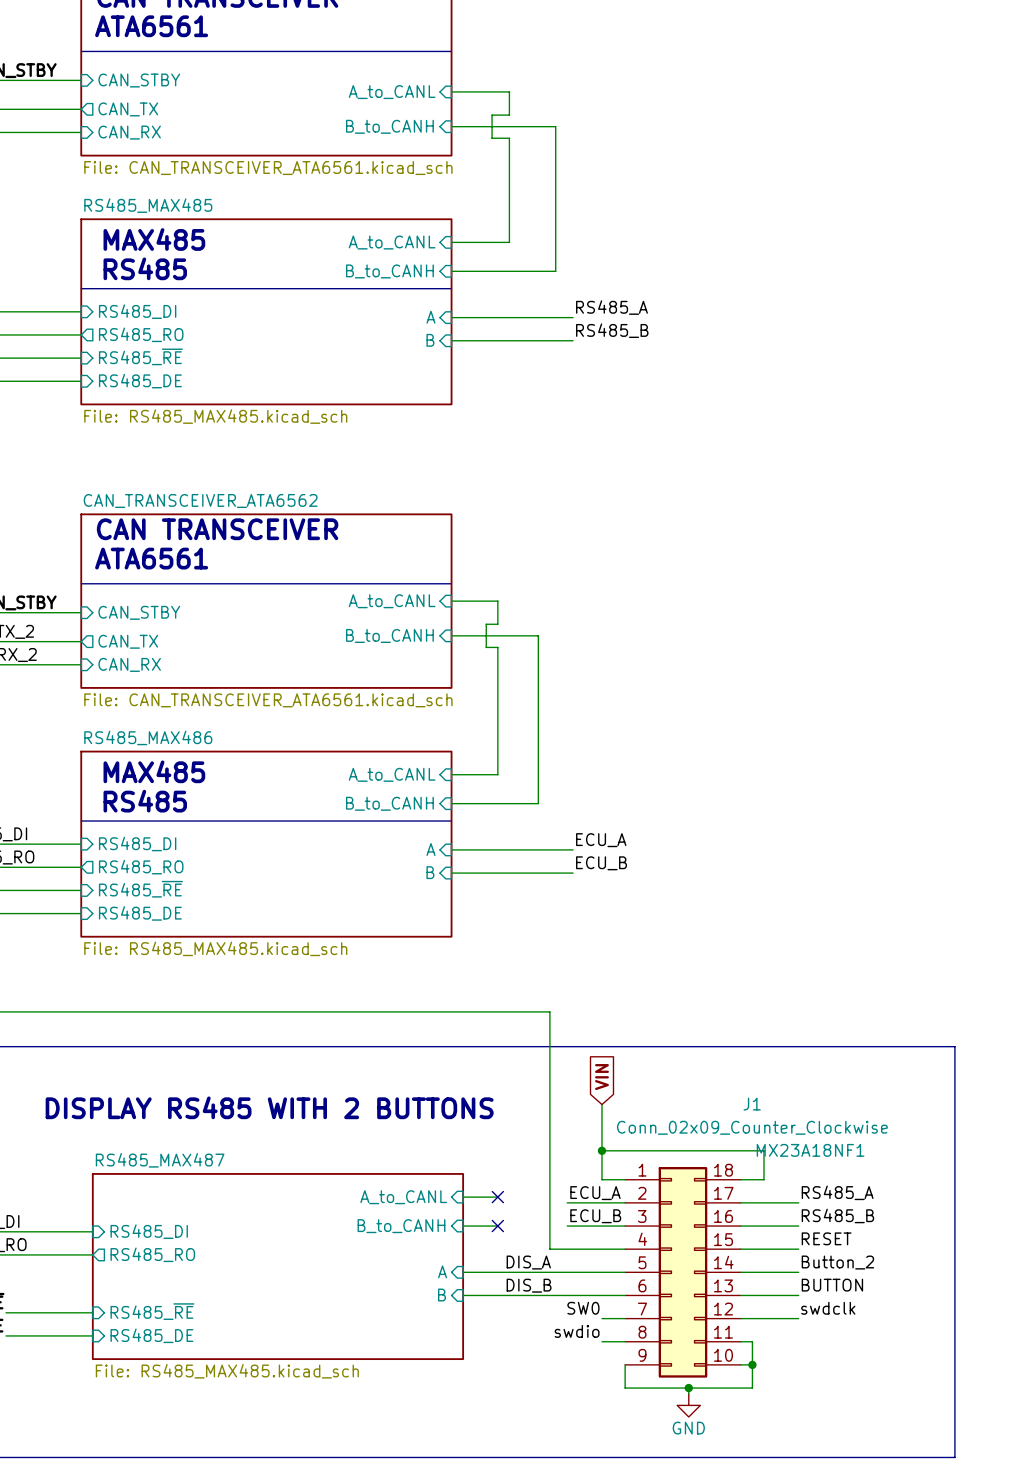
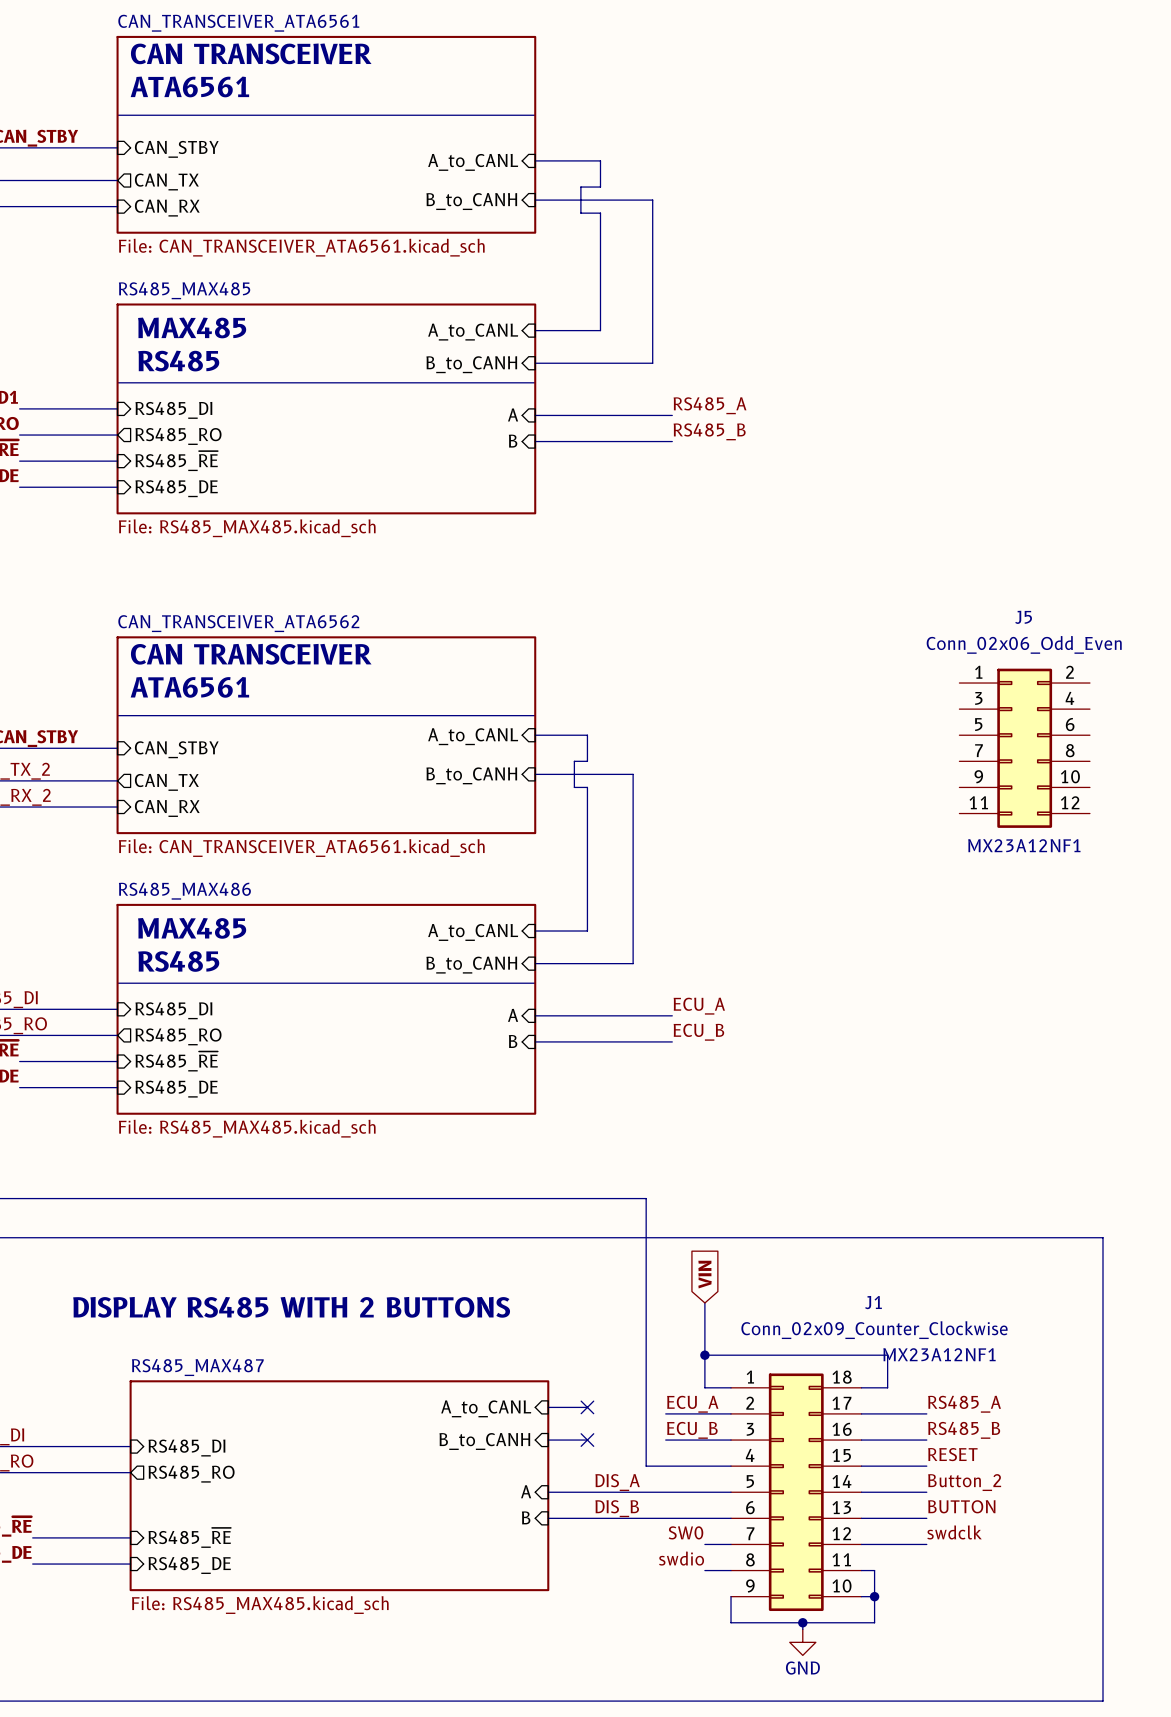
J5: none -> Conn_02x06_Odd_Even (1024, 748)
J1 text: MX23A18NF1 (810, 1150) -> MX23A12NF1 (939, 1354)

